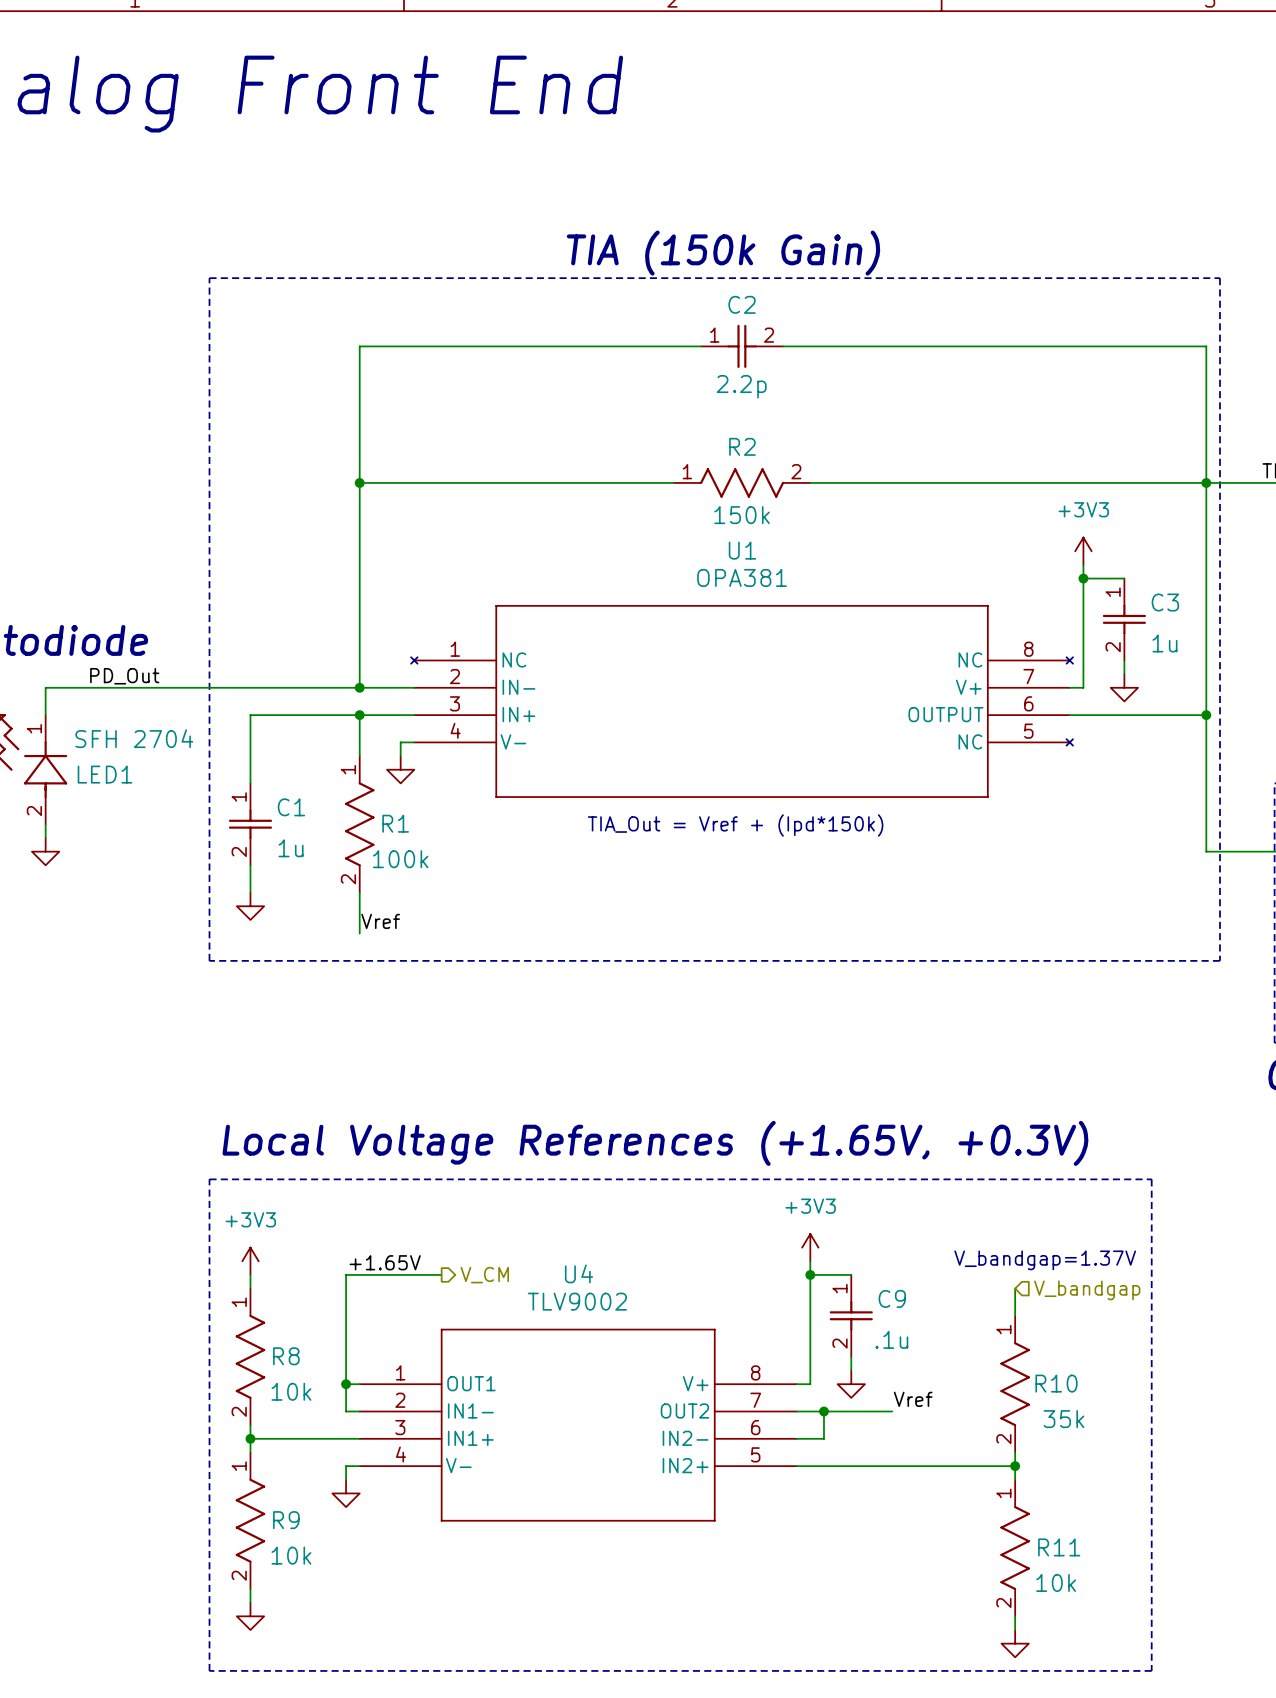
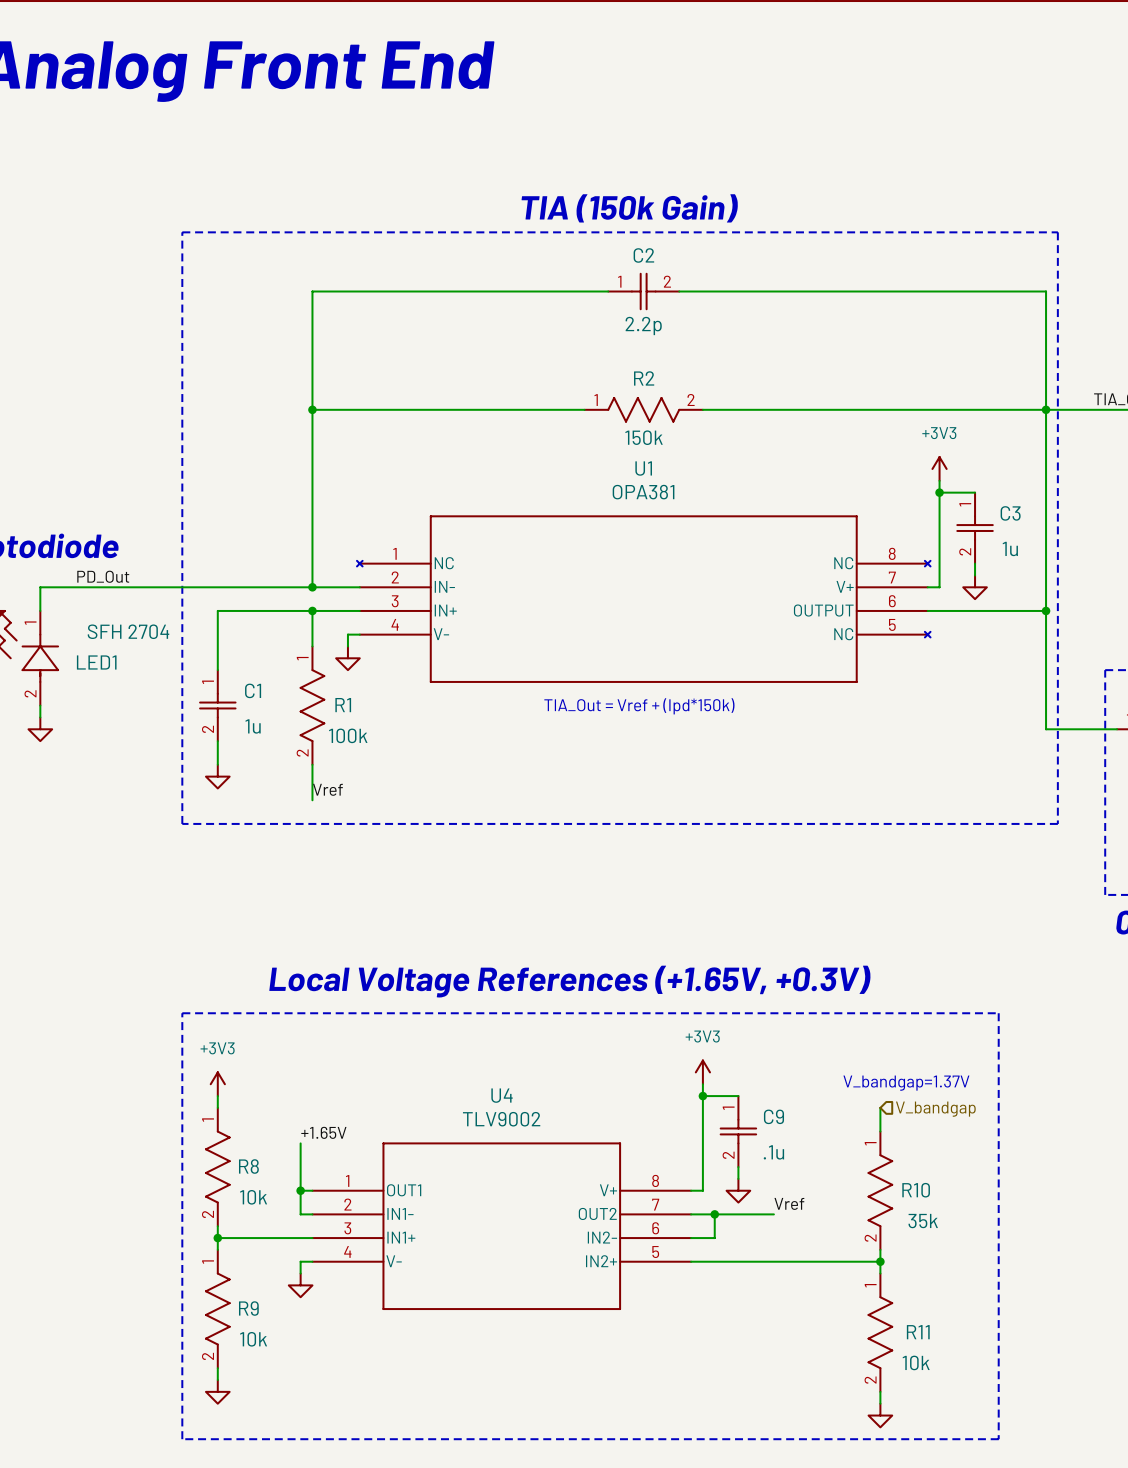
label position: +1.65V (385, 1262) -> +1.65V (323, 1132)
wire: (441, 1274) (346, 1274) (346, 1329) -> none
hierarchical label: V_CM (484, 1275) -> none

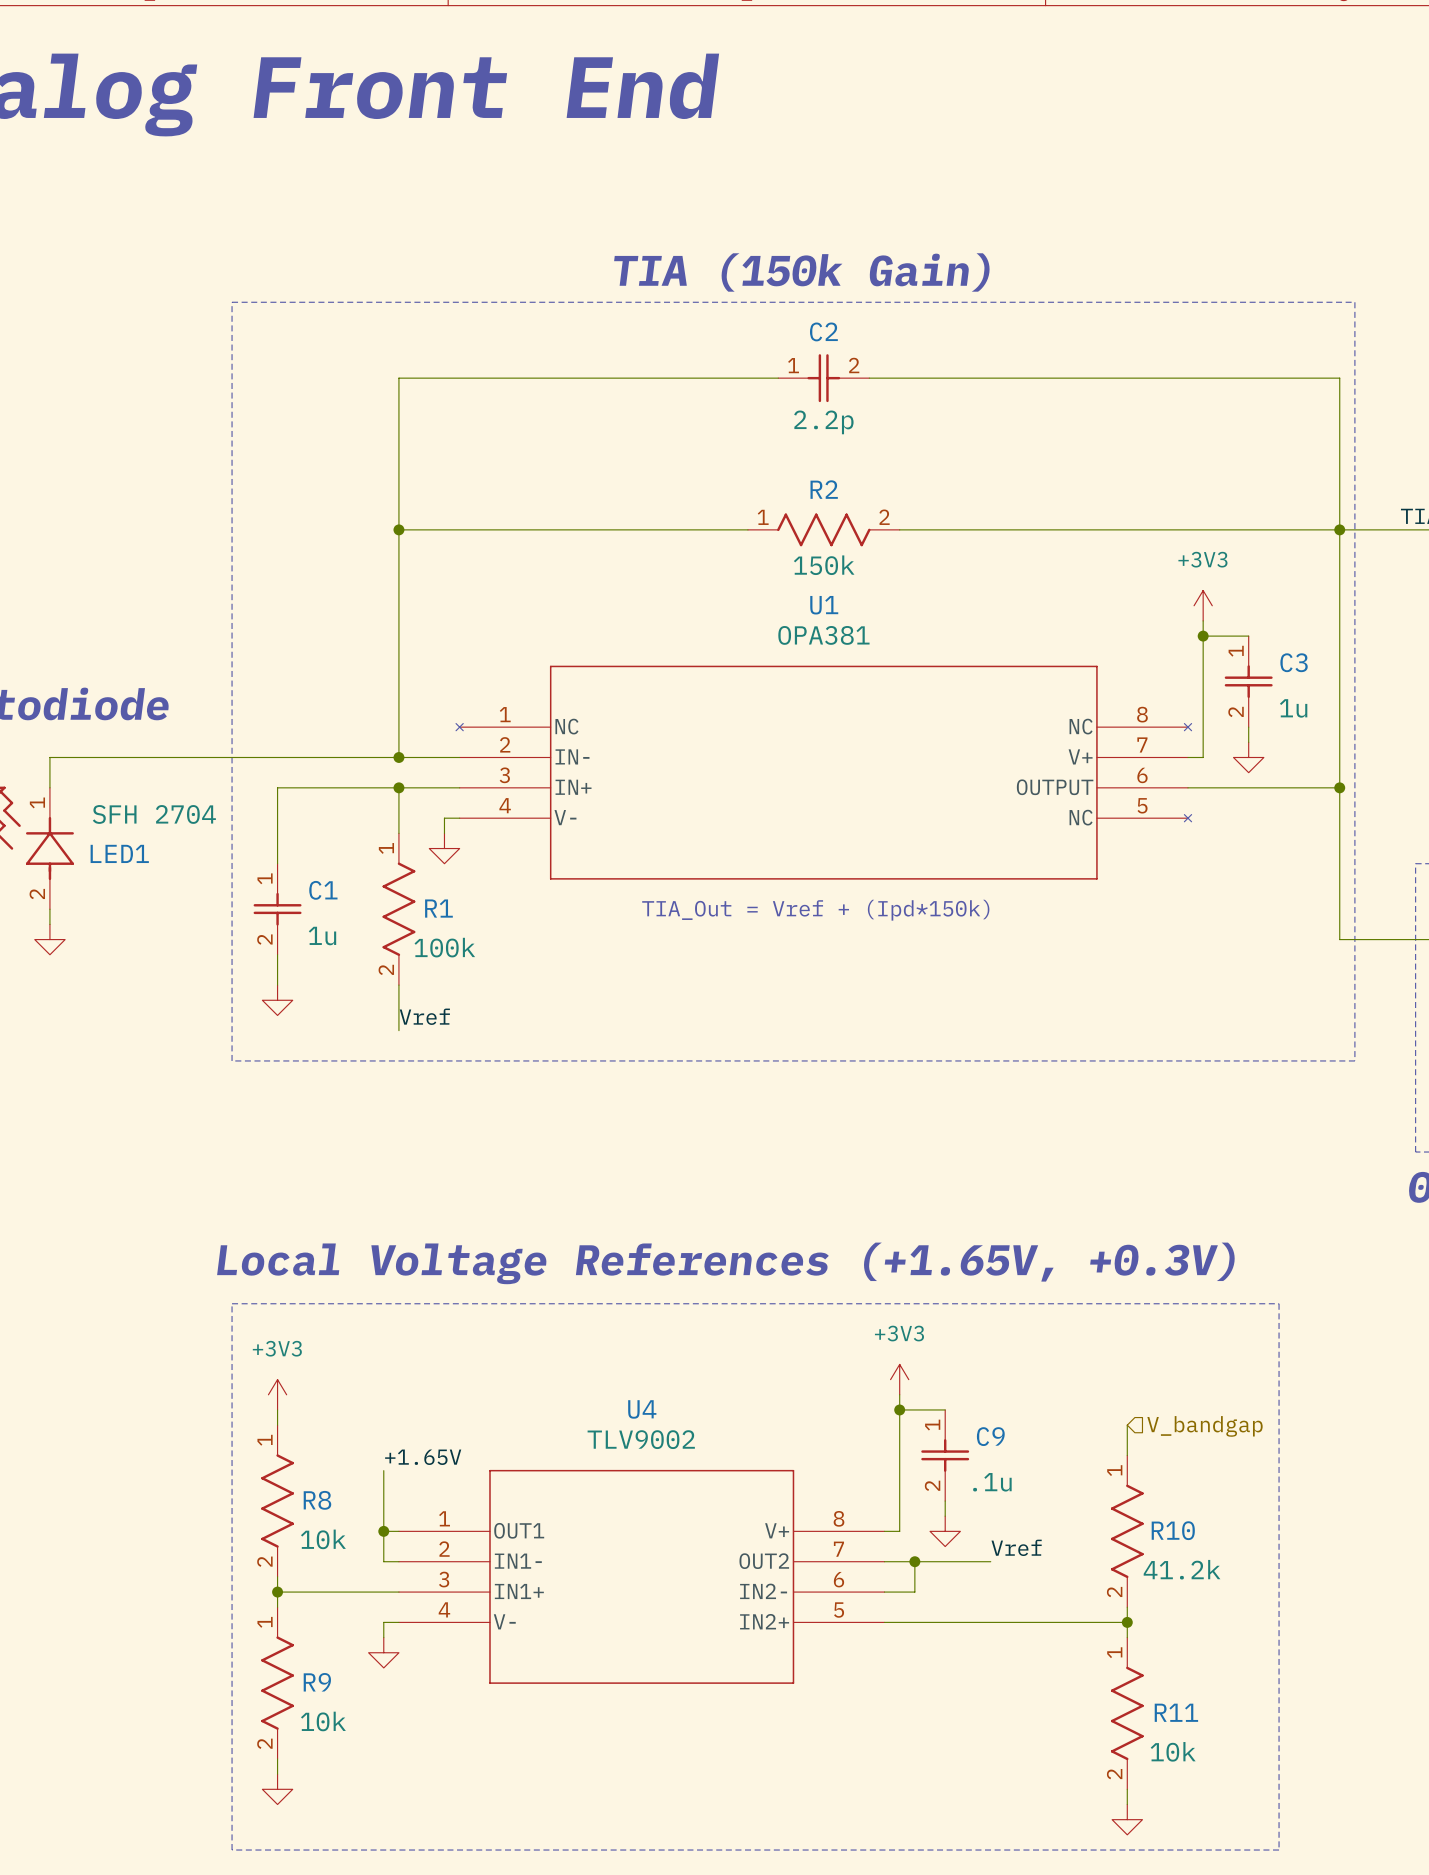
label: PD_Out (103, 576) -> none
text: V_bandgap=1.37V (906, 1083) -> none
R10 value: 35k (923, 1221) -> 41.2k (1182, 1569)

